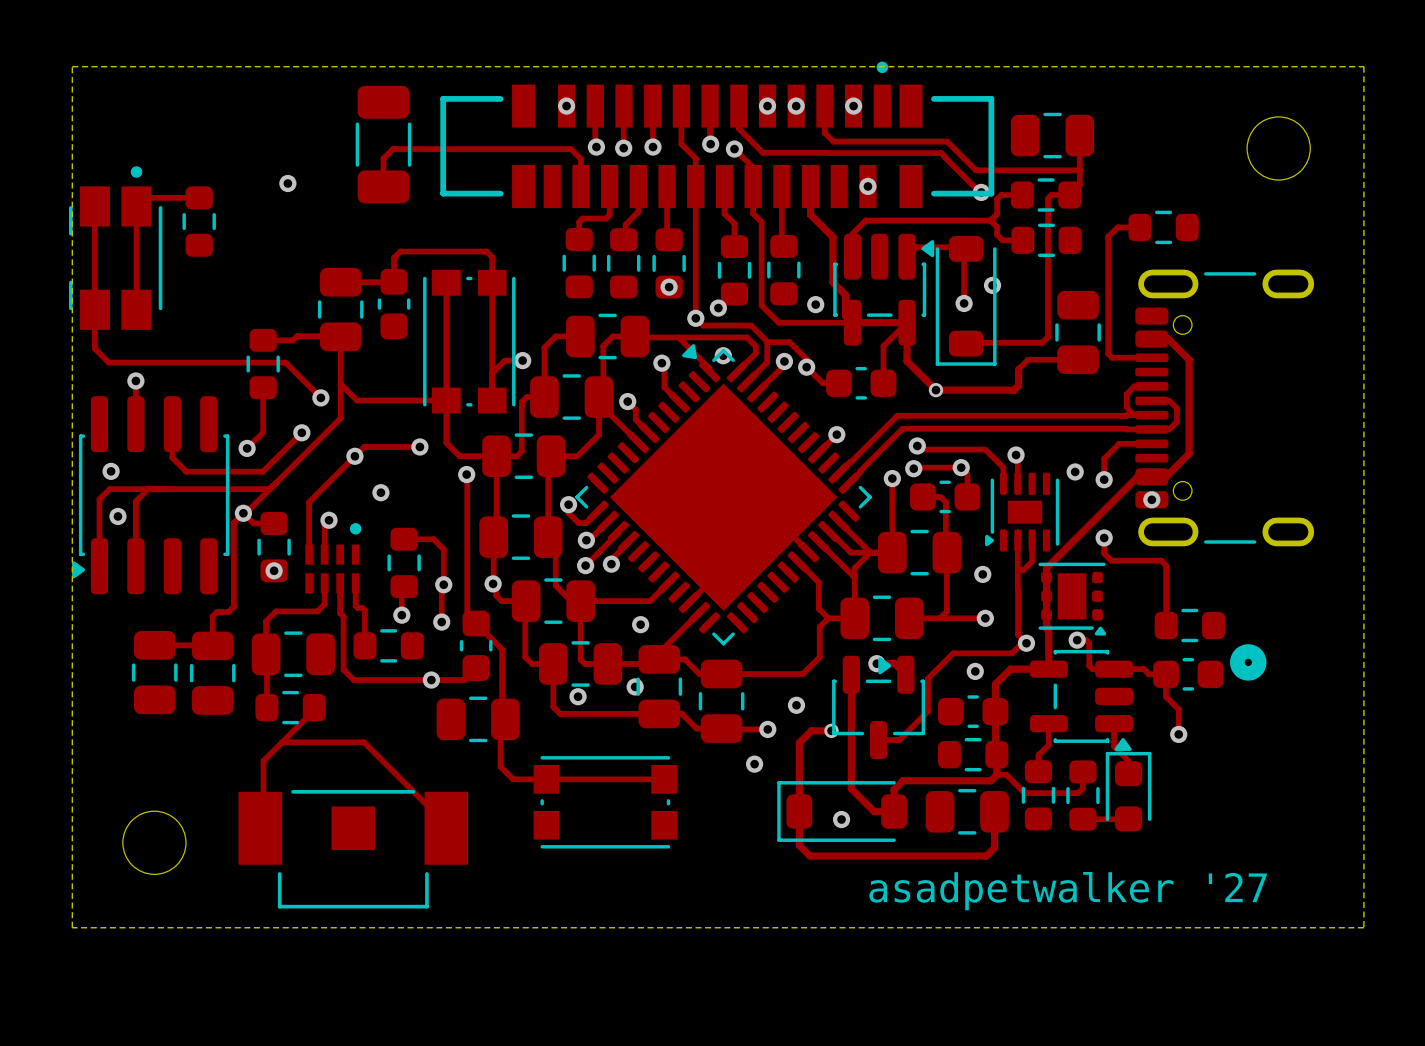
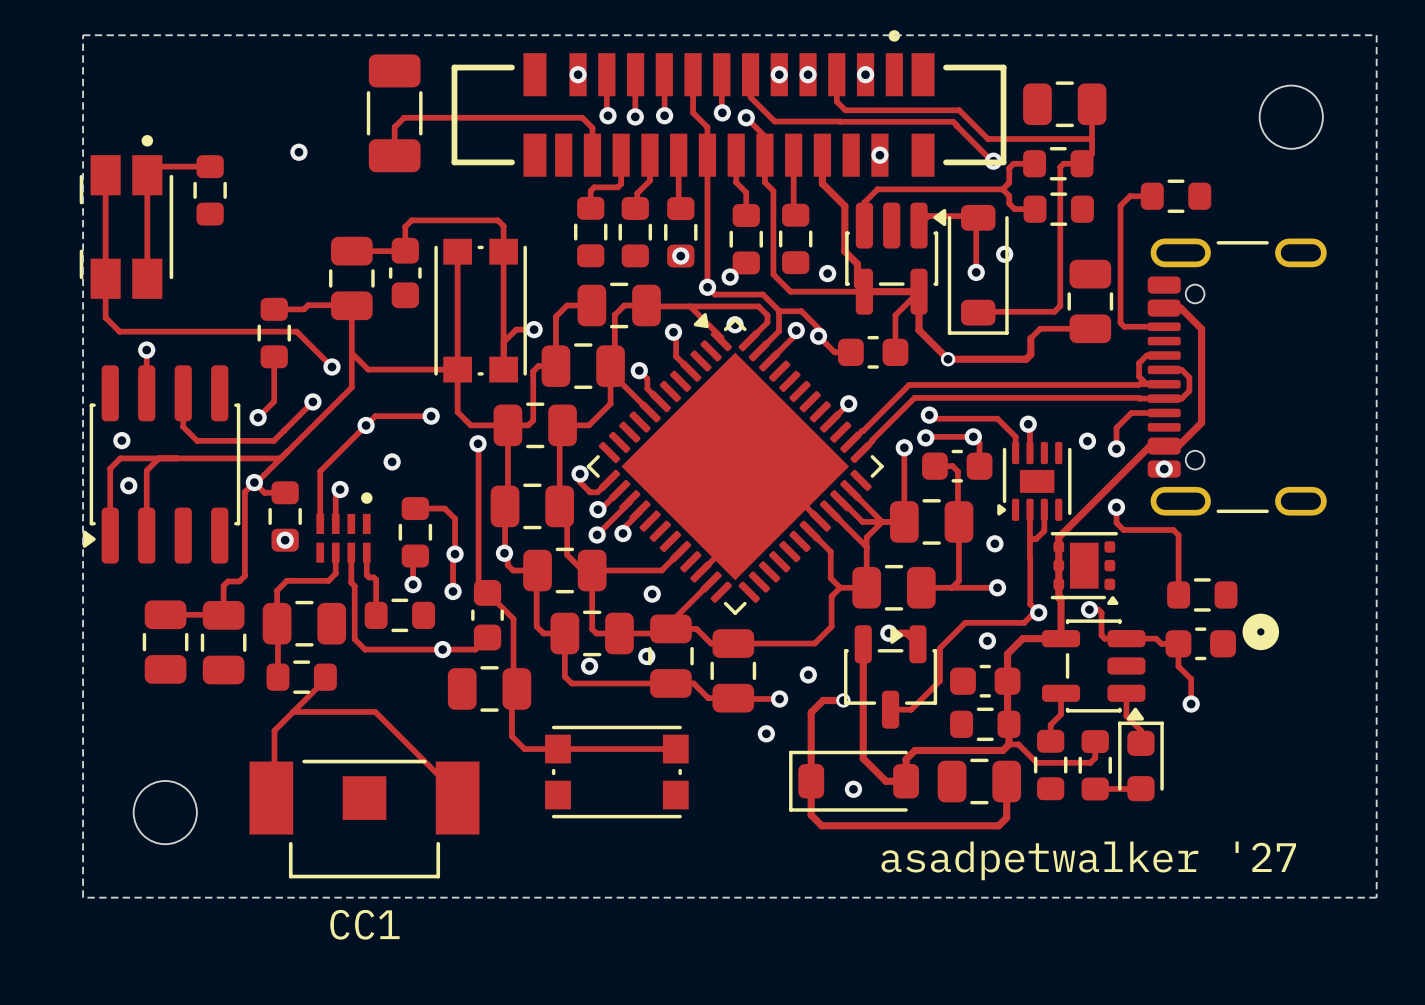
CC1 name: none -> CC1 (364, 924)

